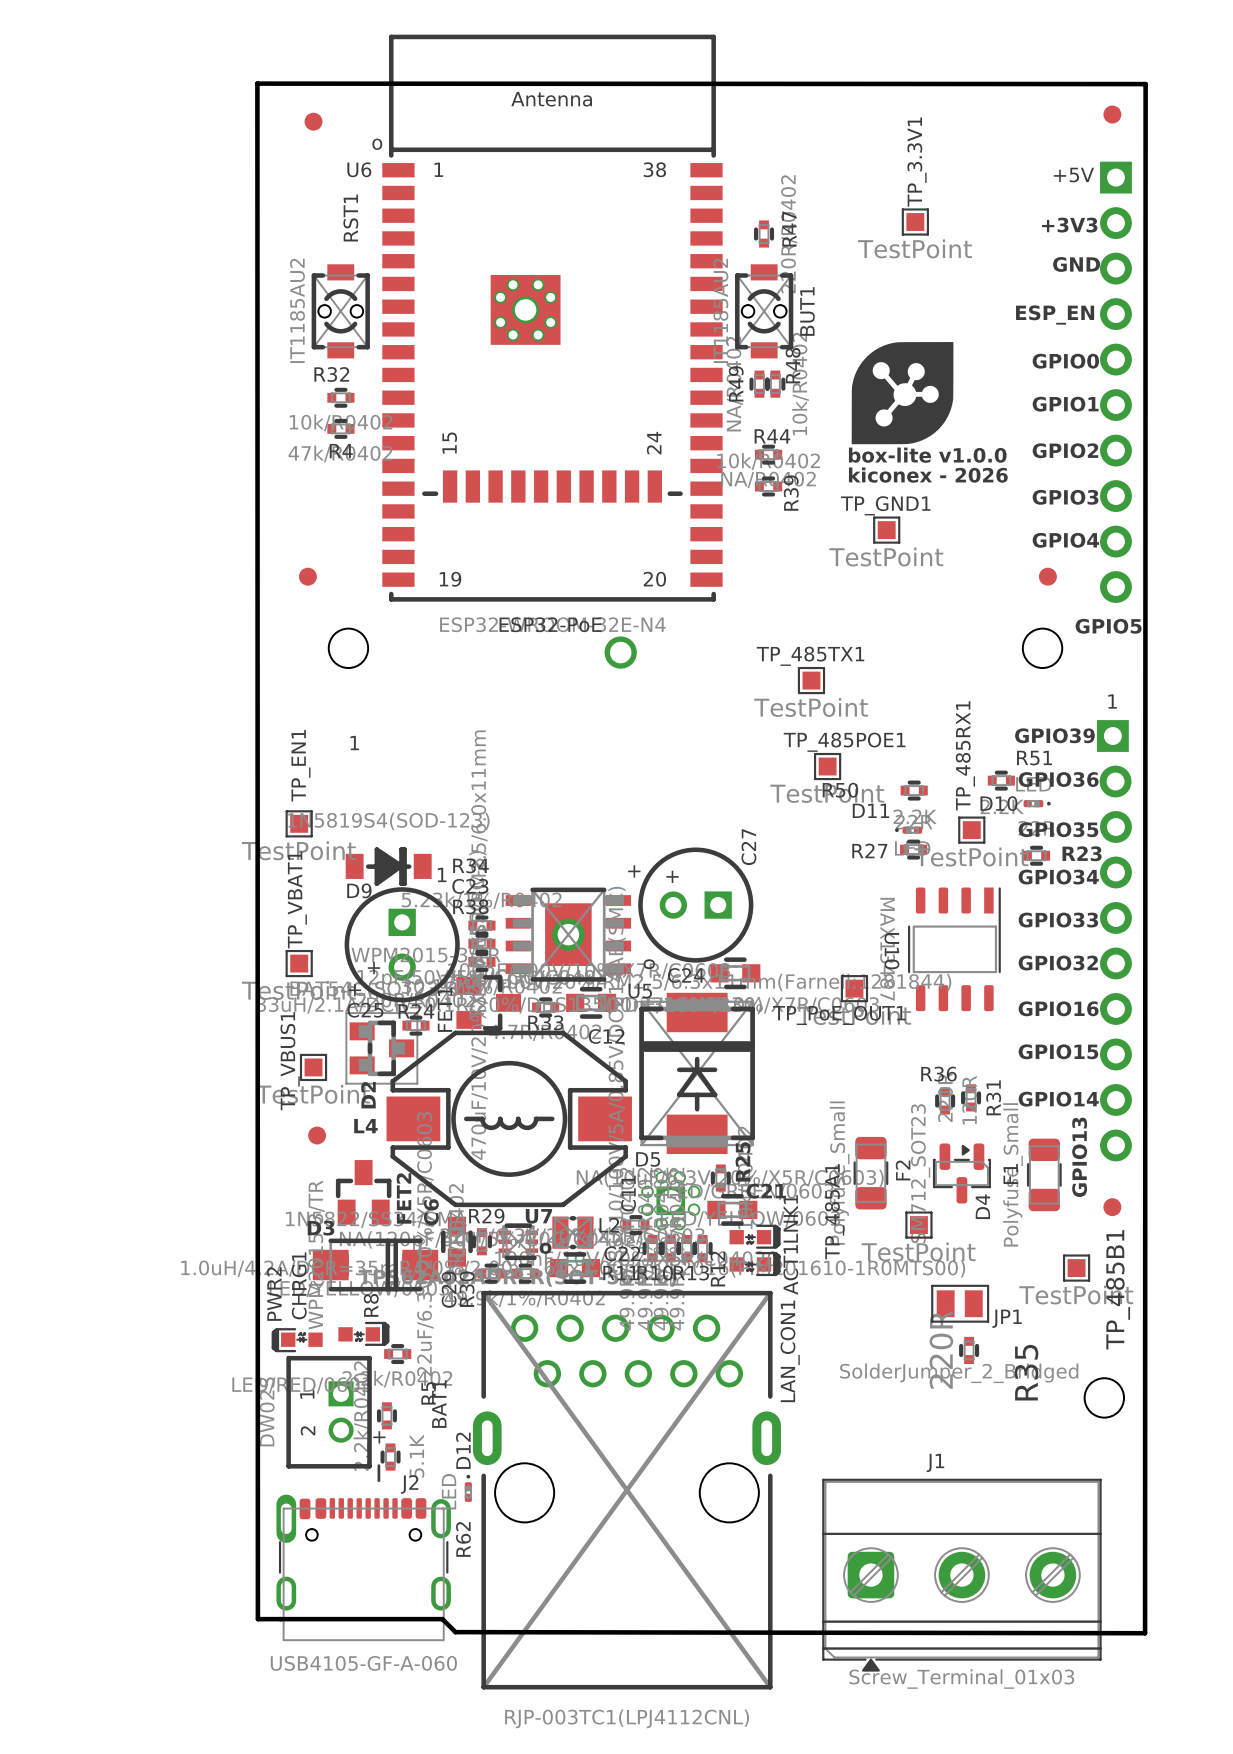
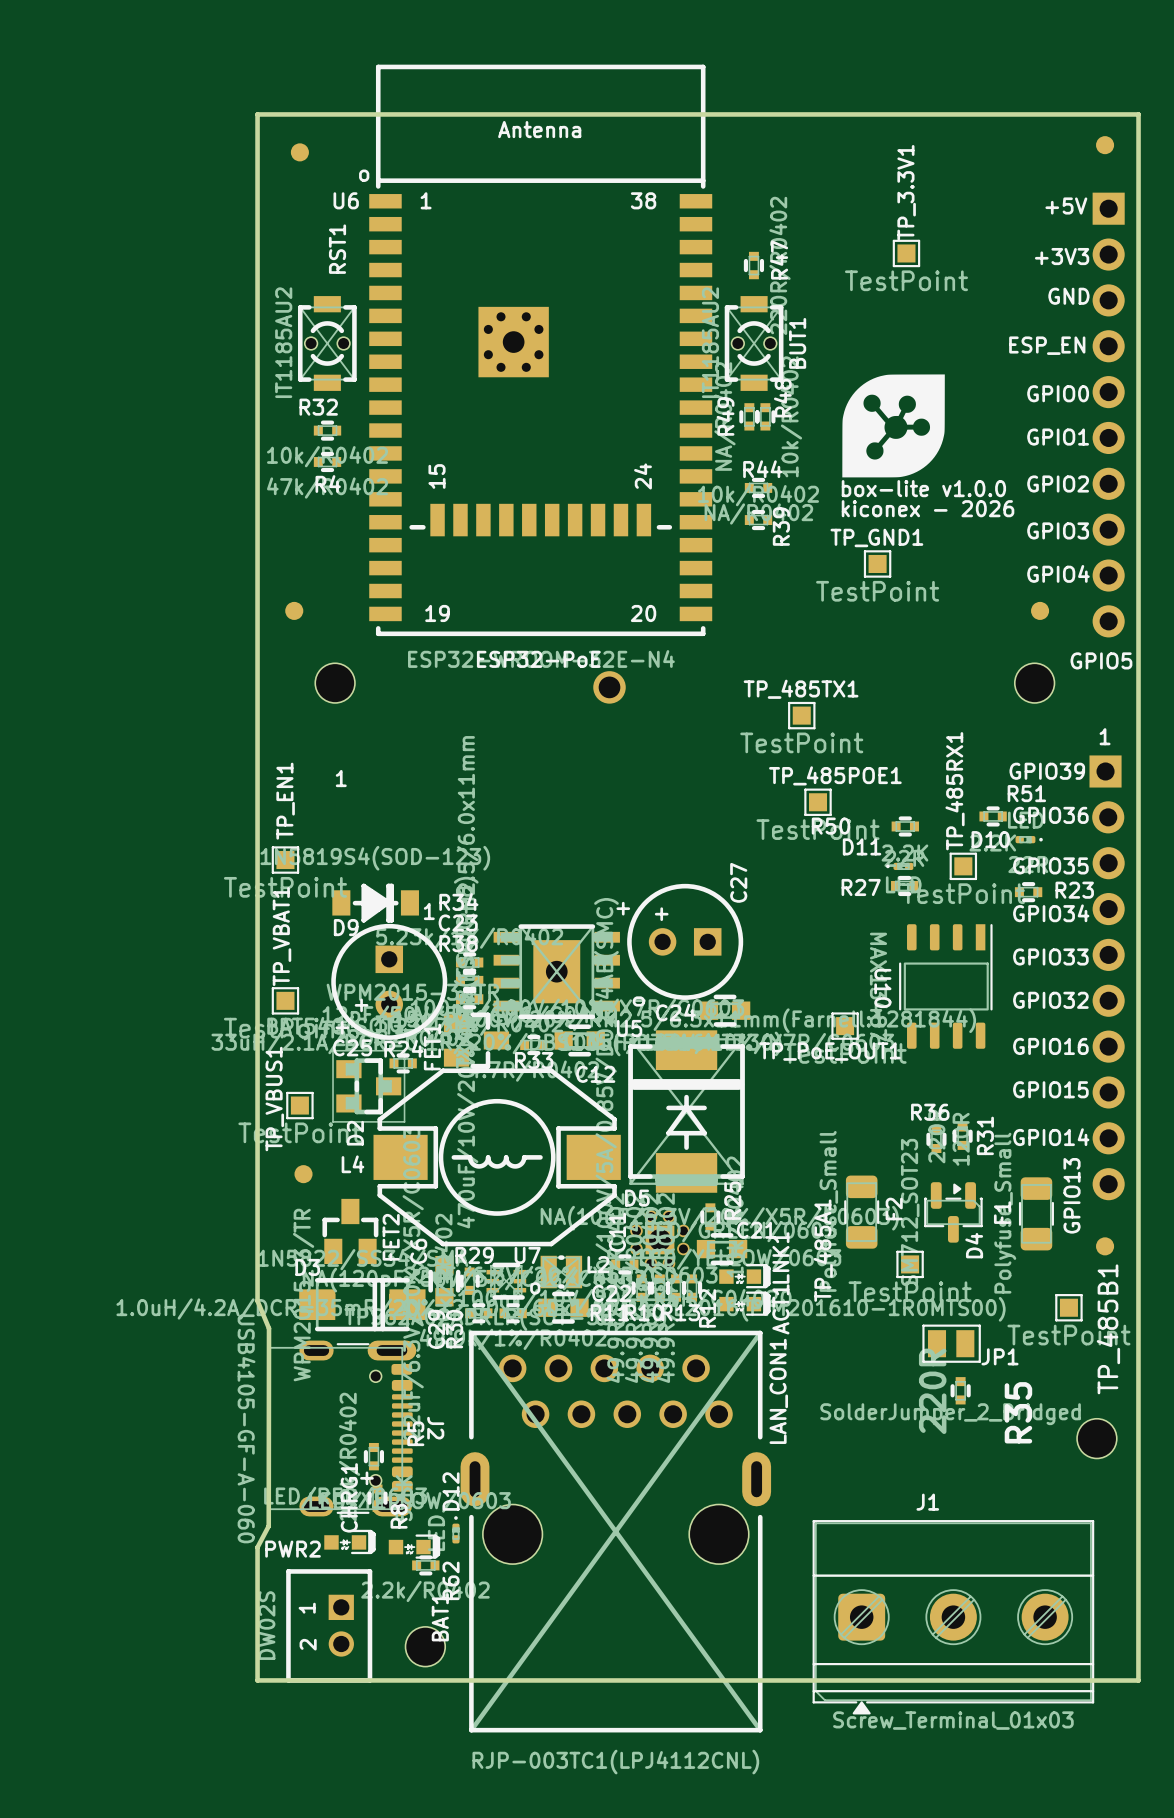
PWR2 name position: PWR2 (274, 1294) -> PWR2 (293, 1549)
CHRG1 position: (363, 1333) -> (414, 1546)
PWR2 rotation: 0° (297, 1340) -> 180° (350, 1541)
PWR2 position: (297, 1340) -> (350, 1541)
R8 position: (397, 1354) -> (425, 1565)
BAT1 position: (329, 1412) -> (329, 1625)
line: (378, 1465) (378, 1480) -> none
J2 name position: J2 (409, 1484) -> J2 (435, 1428)
J2 rotation: 0° (363, 1567) -> 90° clockwise (342, 1428)
J2 position: (363, 1567) -> (342, 1428)
part: none -> (425, 1646)
board edge: (257, 1619) (257, 83) (1145, 84) (1145, 1633) (455, 1632) (442, 1619) (257, 1619) -> (257, 114) (257, 1300) (269, 1328) (268, 1526) (257, 1547) (257, 1680) (1138, 1680) (1138, 114) (257, 114)

